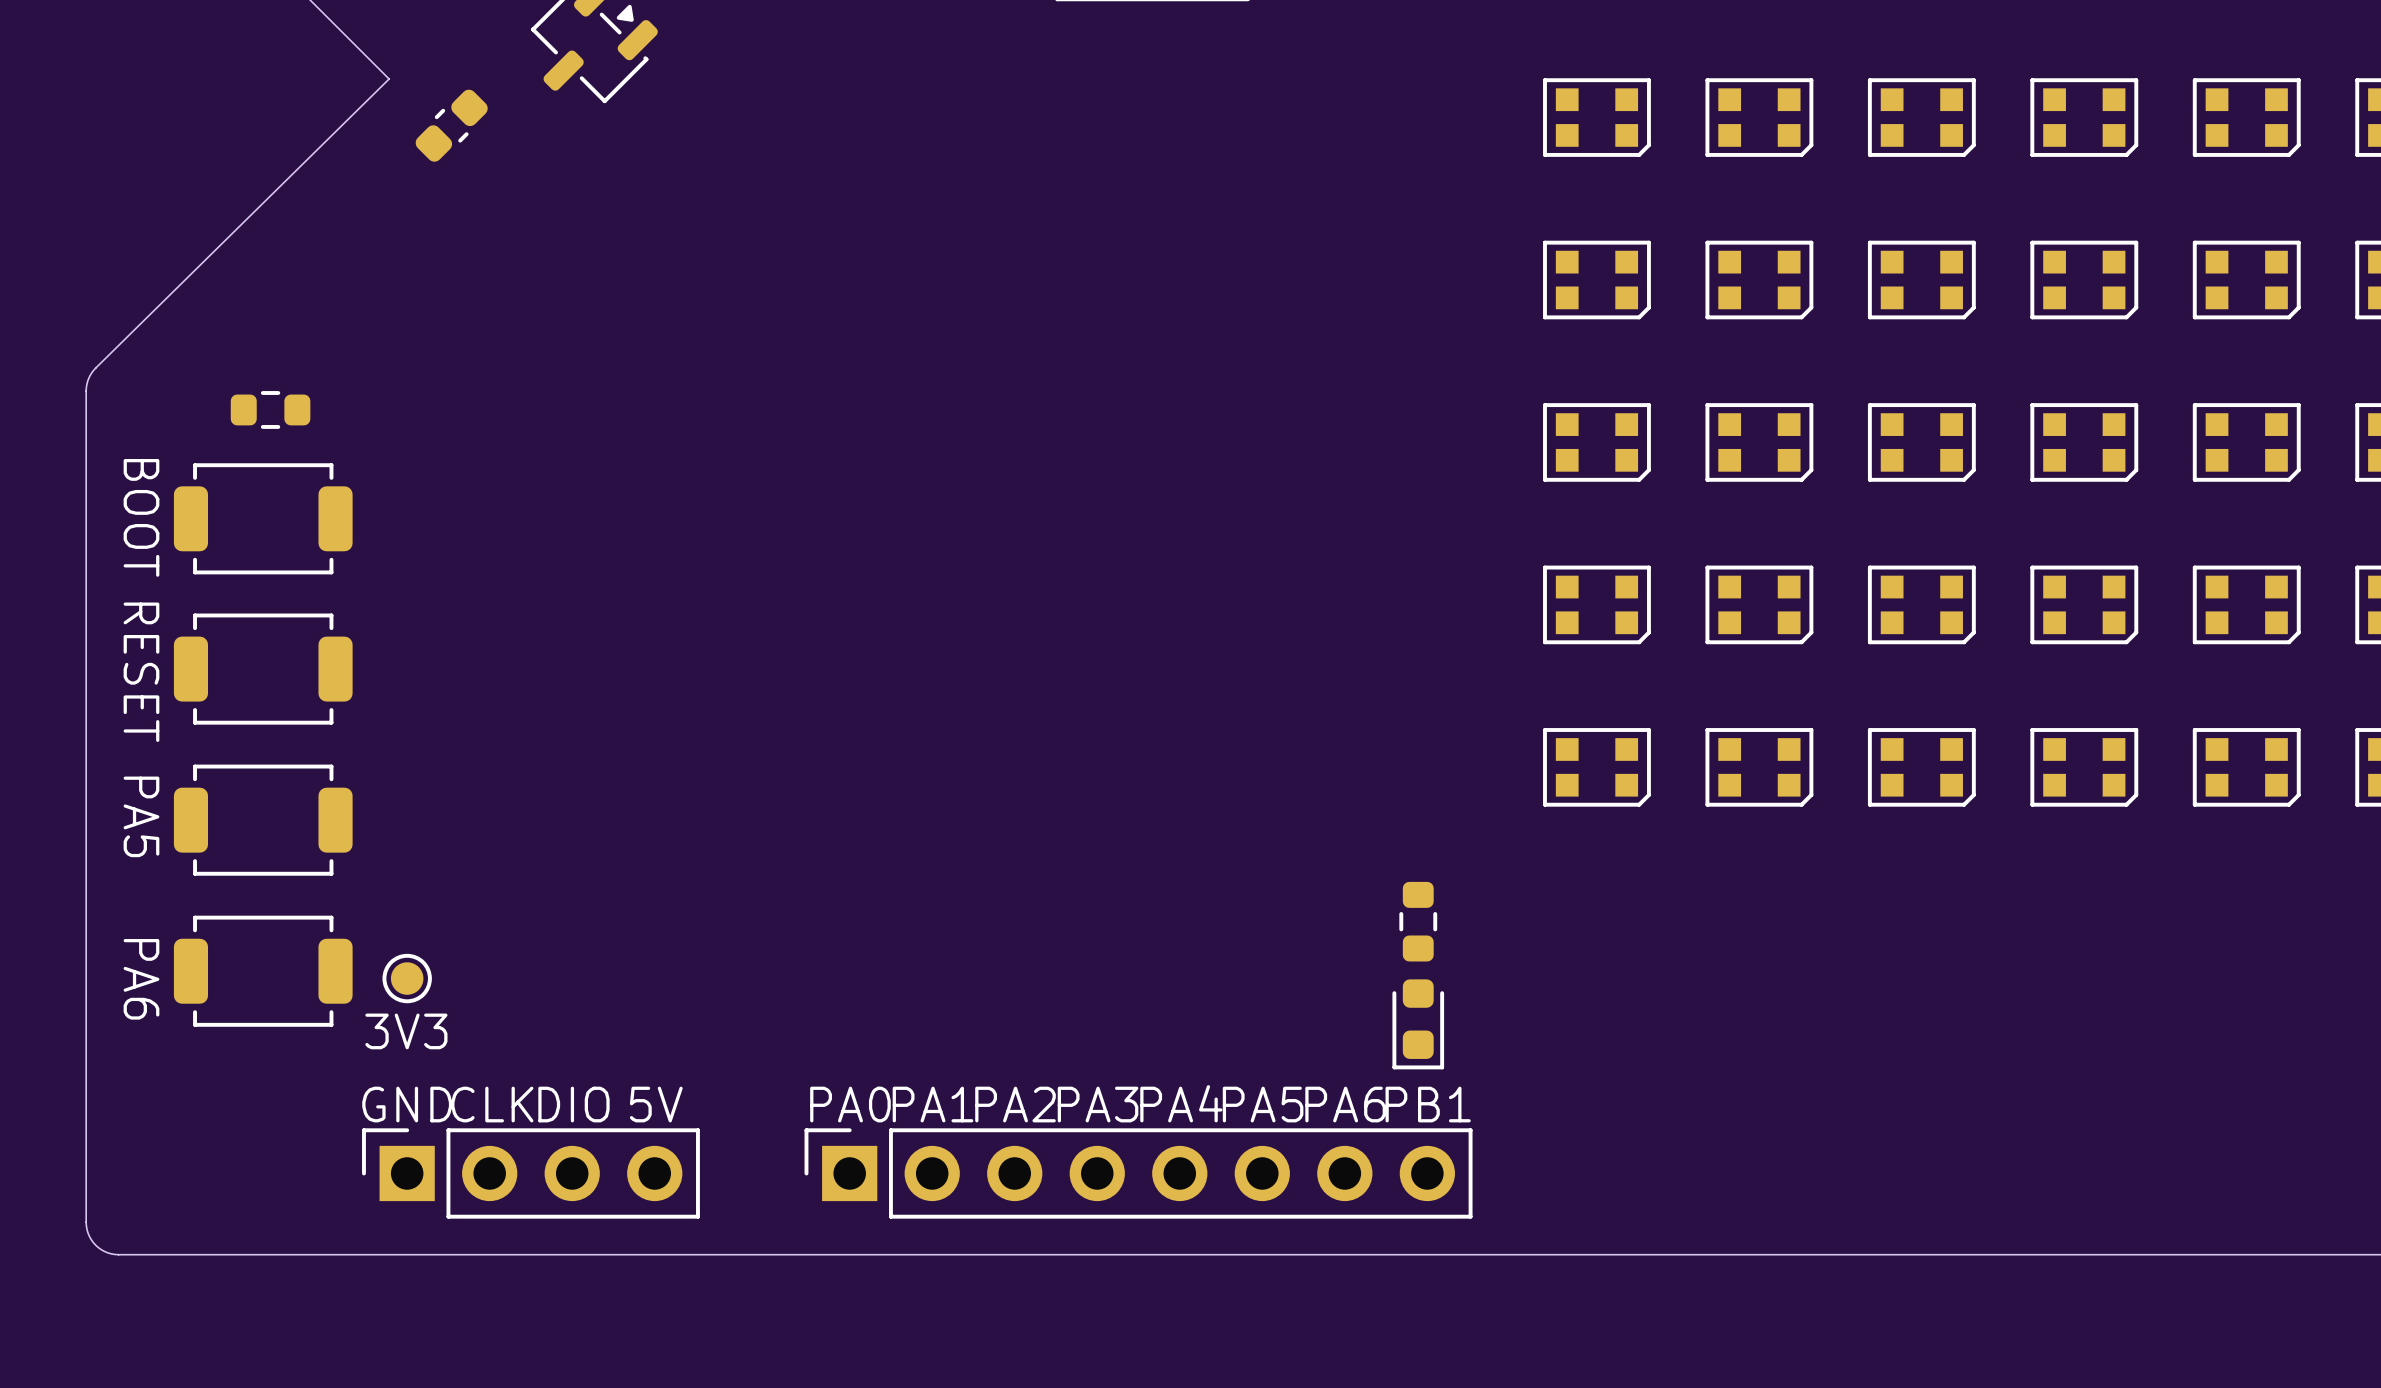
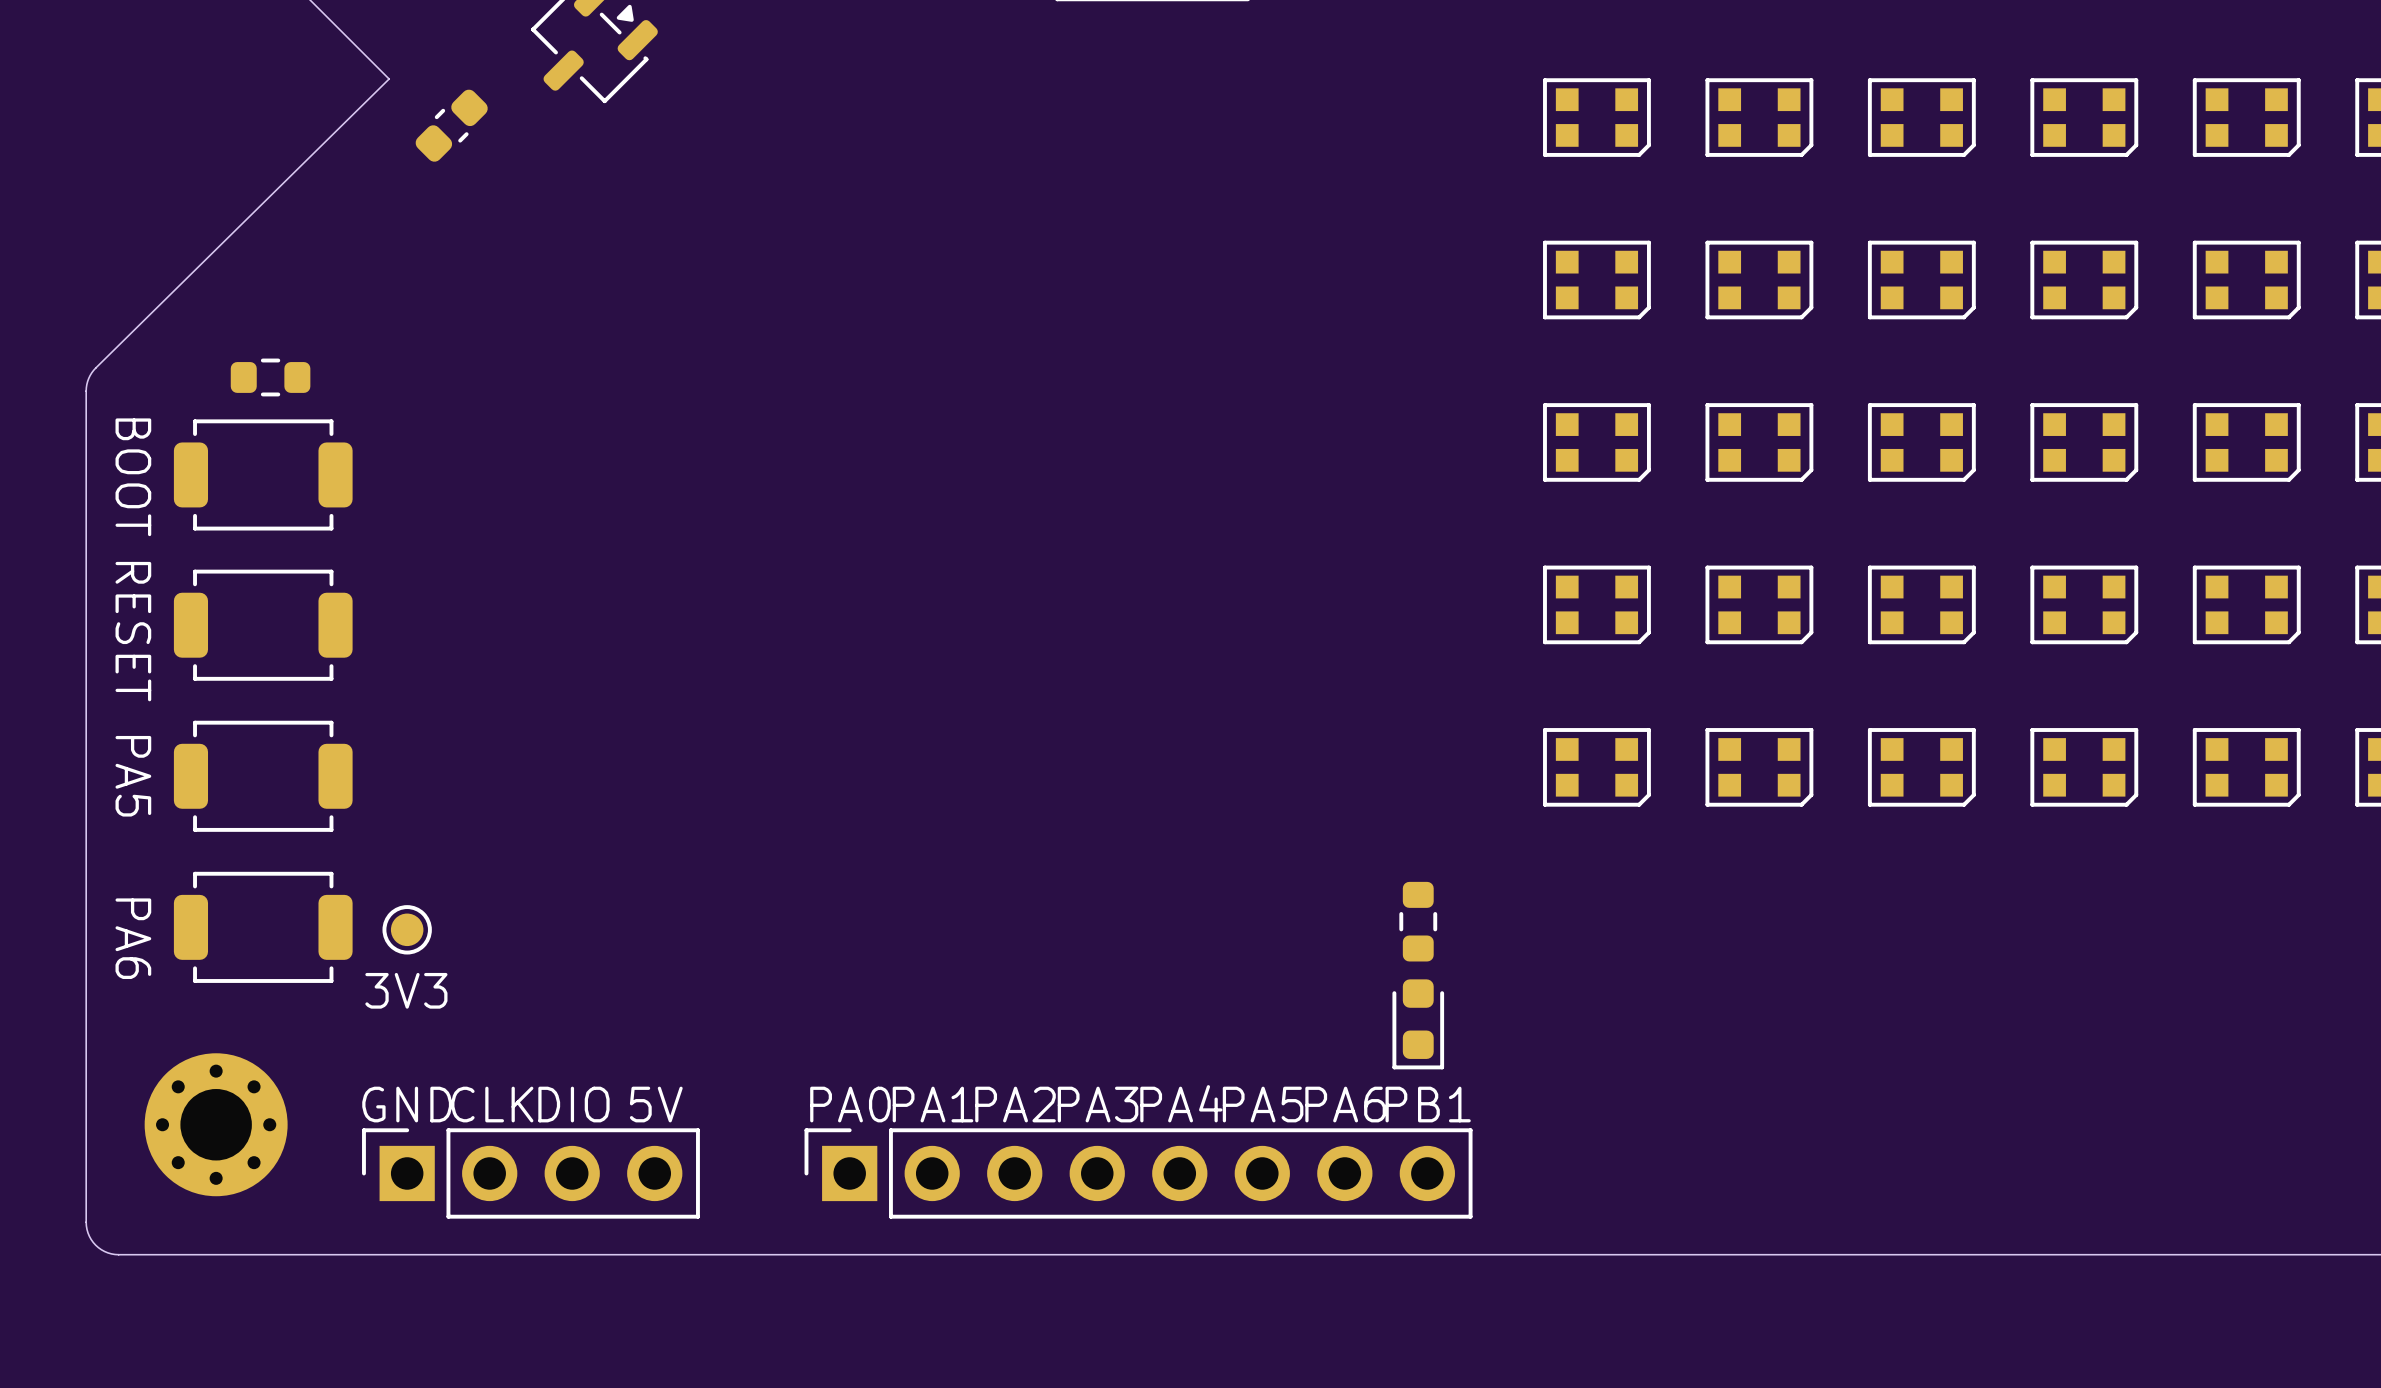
part position: (270, 409) -> (270, 377)
text position: BOOT (141, 517) -> BOOT (133, 477)
part position: (263, 518) -> (263, 474)
part position: (263, 669) -> (263, 625)
text position: RESET (141, 672) -> RESET (133, 631)
text position: PA5 (141, 816) -> PA5 (133, 776)
part position: (263, 820) -> (263, 776)
part position: (263, 971) -> (263, 927)
part position: (407, 978) -> (407, 929)
text position: PA6 (141, 979) -> PA6 (133, 938)
text position: 3V3 (406, 1031) -> 3V3 (406, 990)
part: none -> (216, 1124)

